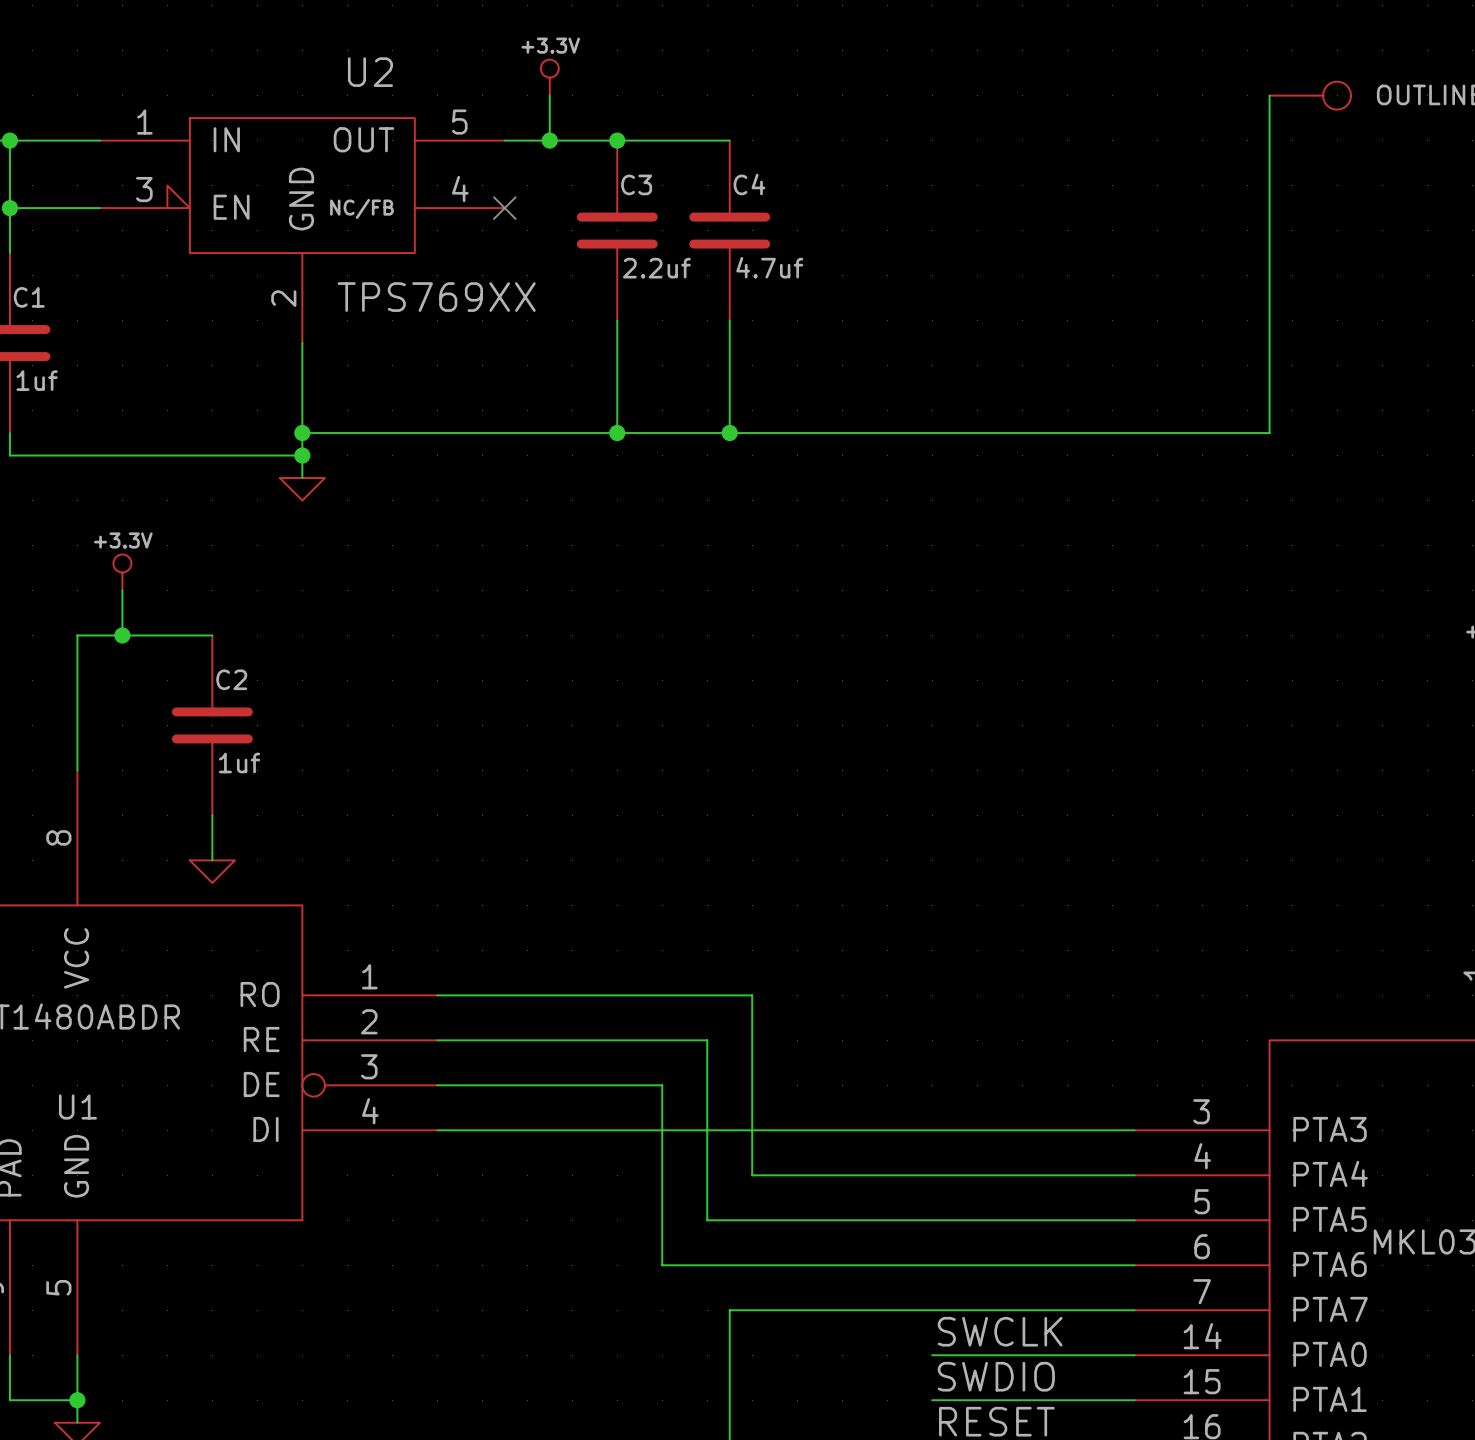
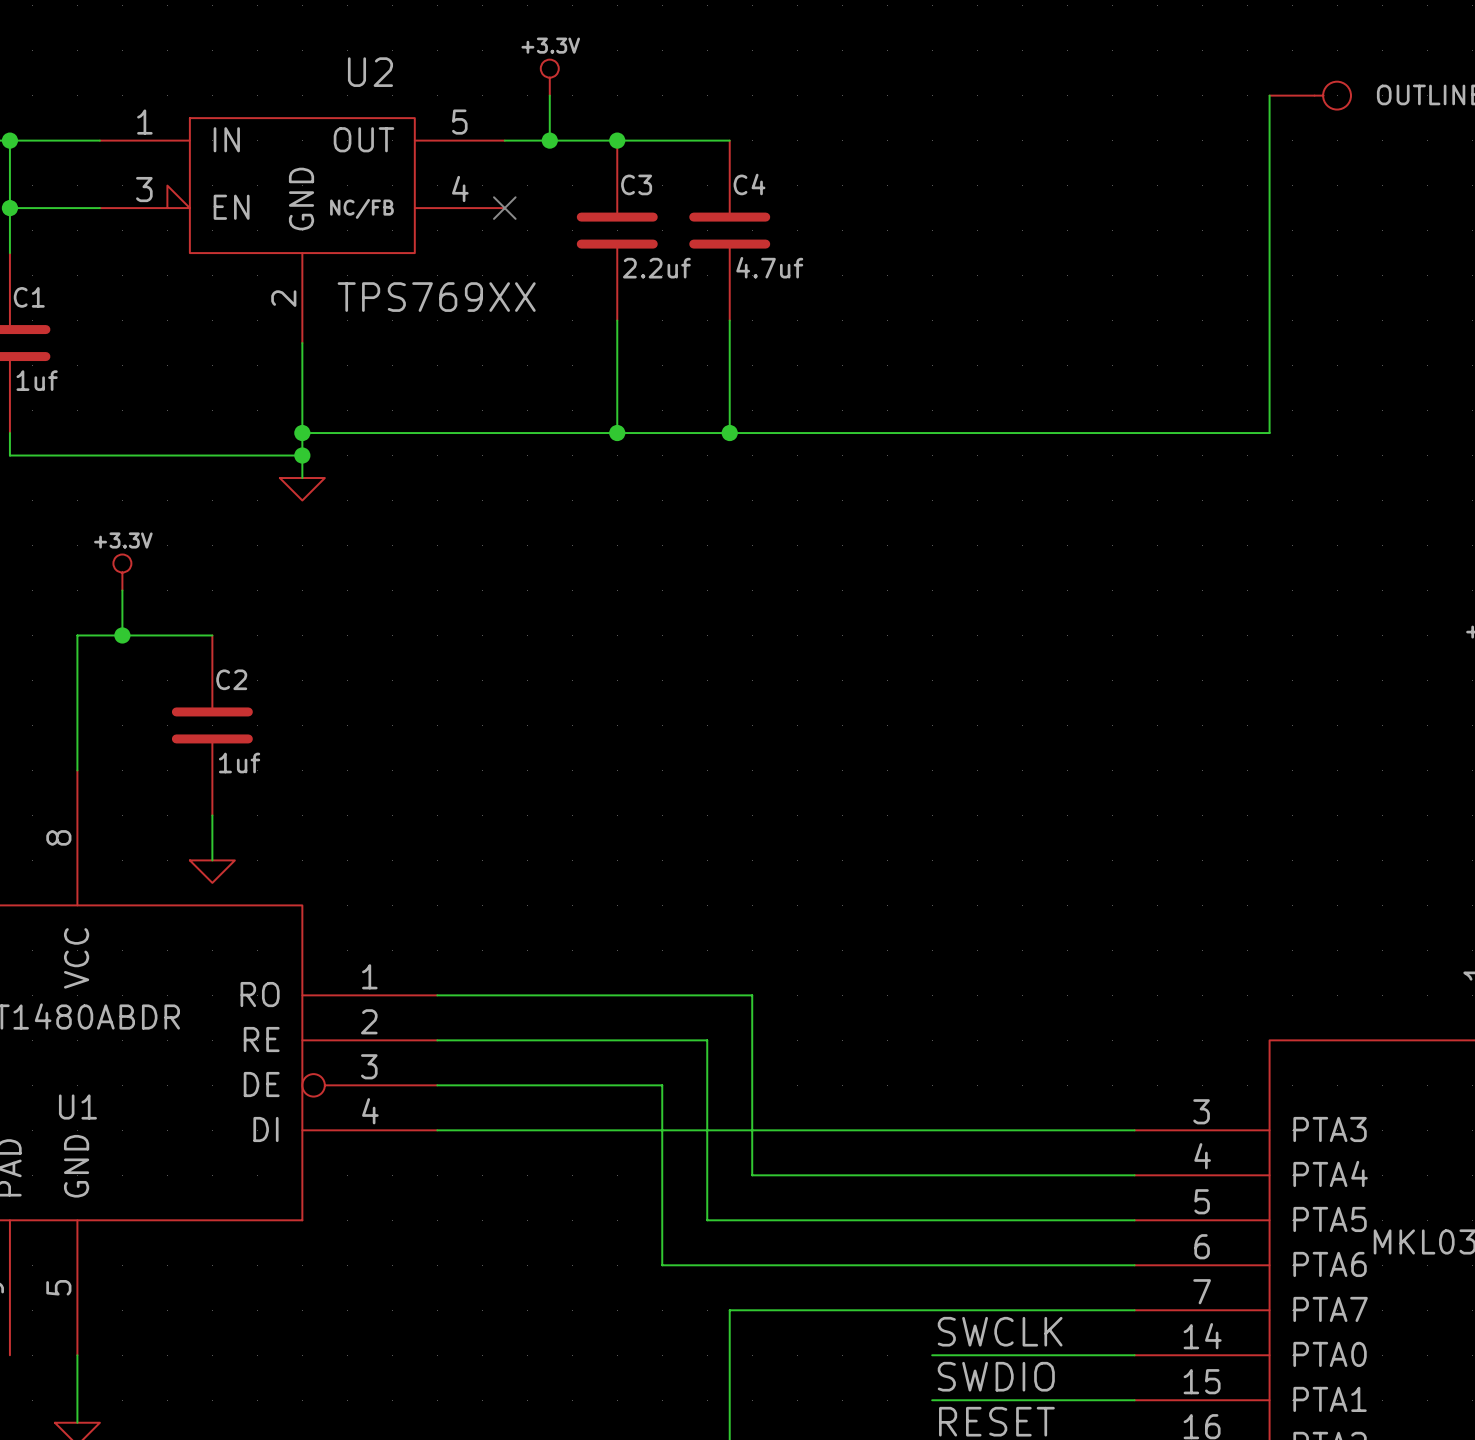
wire: (9, 1355) (9, 1400) (77, 1400) -> none
junction: (77, 1400) -> none

